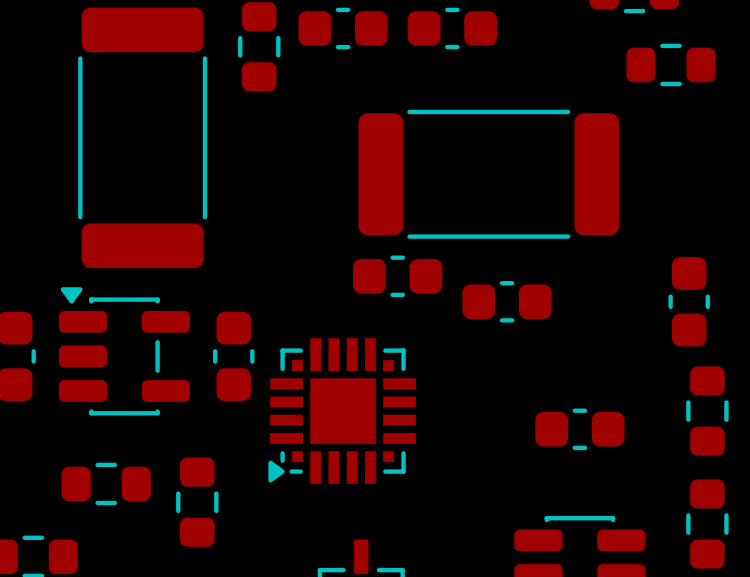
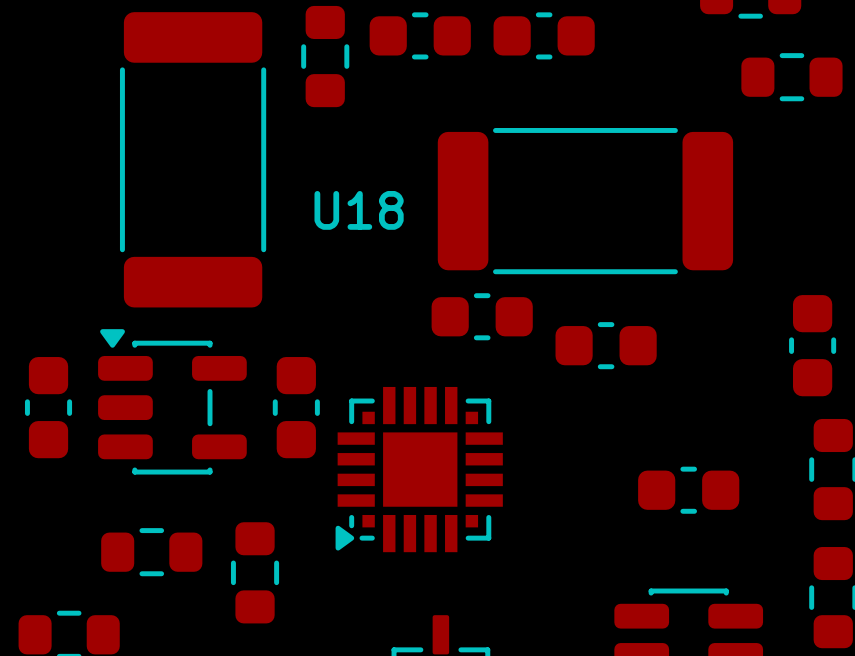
text: none -> U18 (359, 210)

